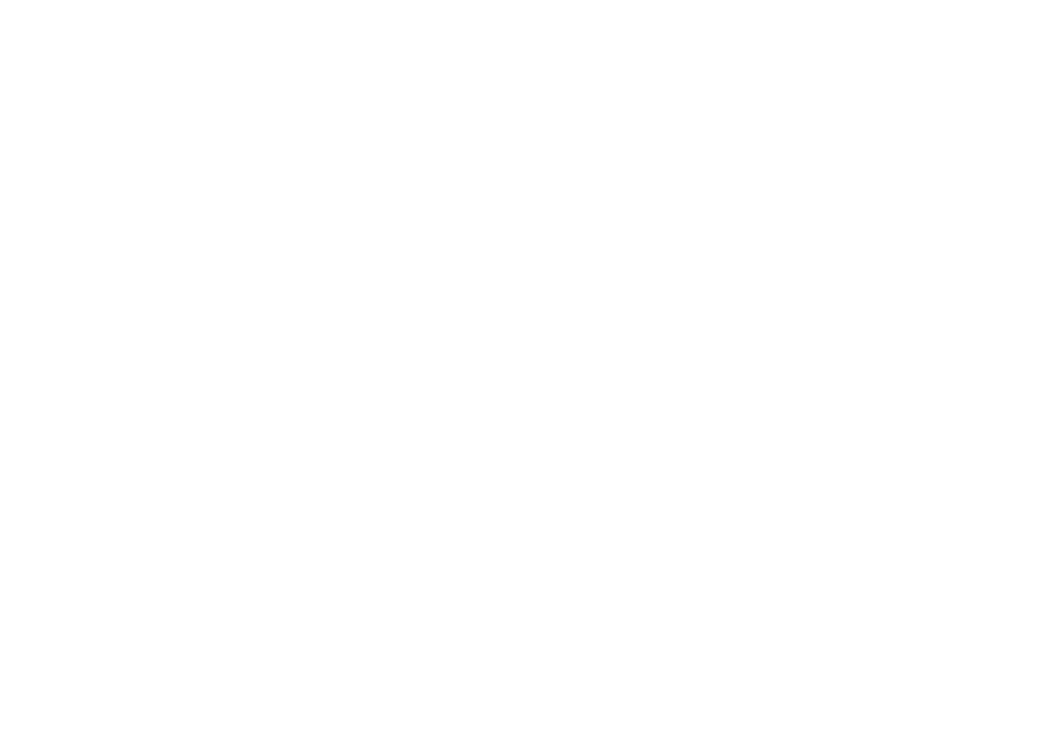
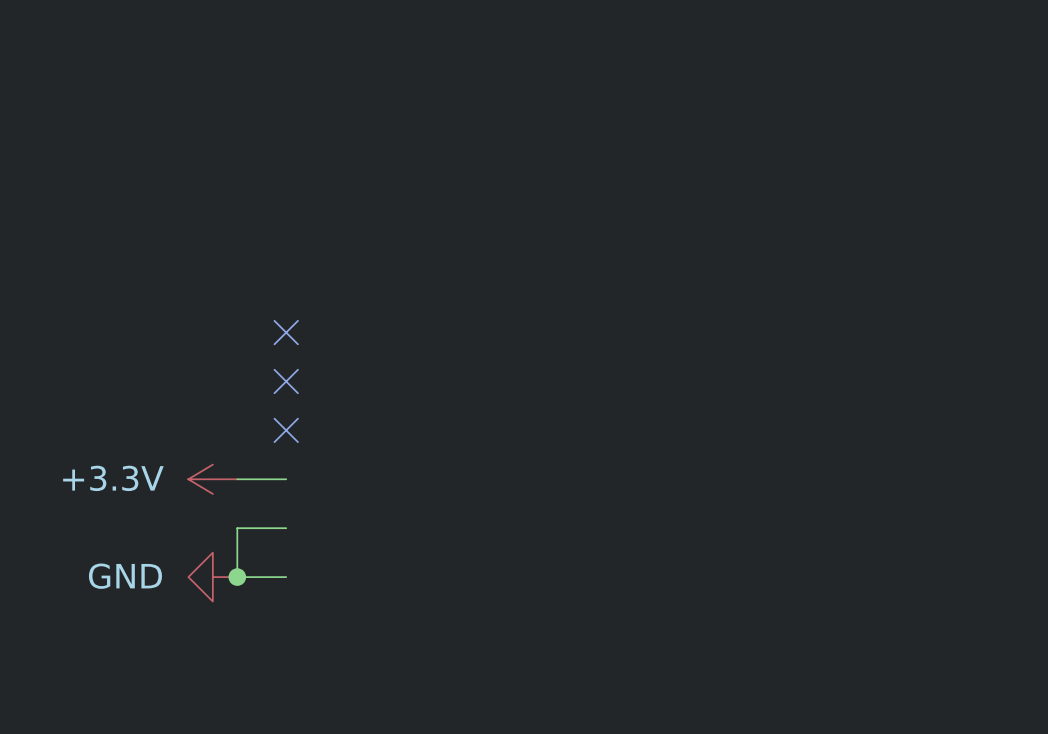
no-connect mark: none -> (286, 332)
no-connect mark: none -> (286, 381)
no-connect mark: none -> (286, 430)
power symbol: none -> +3.3V (212, 479)
wire: none -> (237, 479) (286, 479)
wire: none -> (286, 528) (237, 528) (237, 577) (286, 577)
power symbol: none -> GND (212, 577)
junction: none -> (237, 577)

